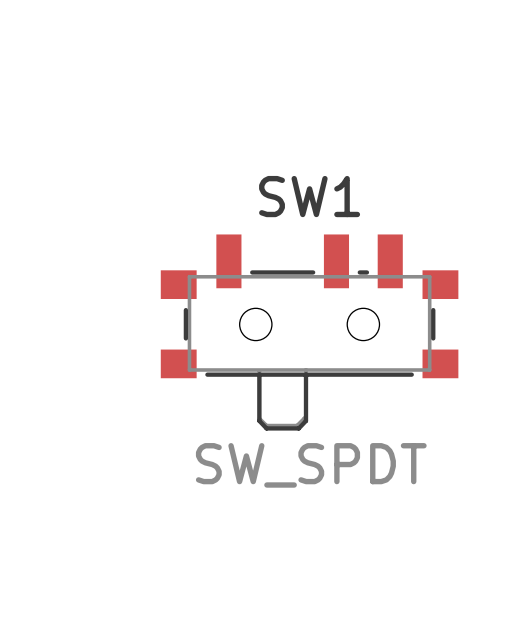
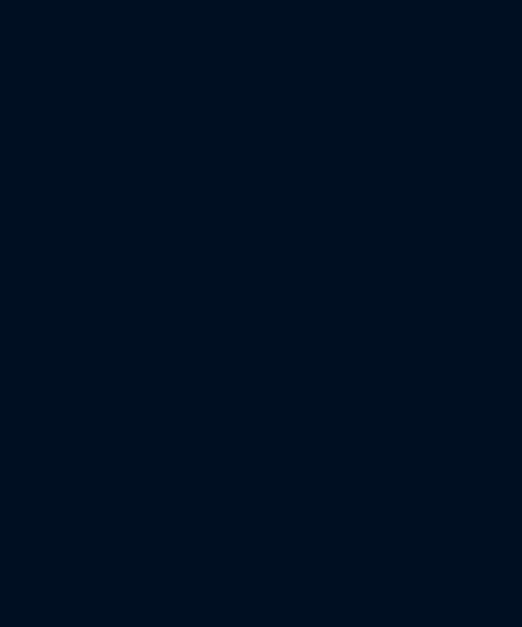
SW1: SW_SPDT (309, 332) -> none

